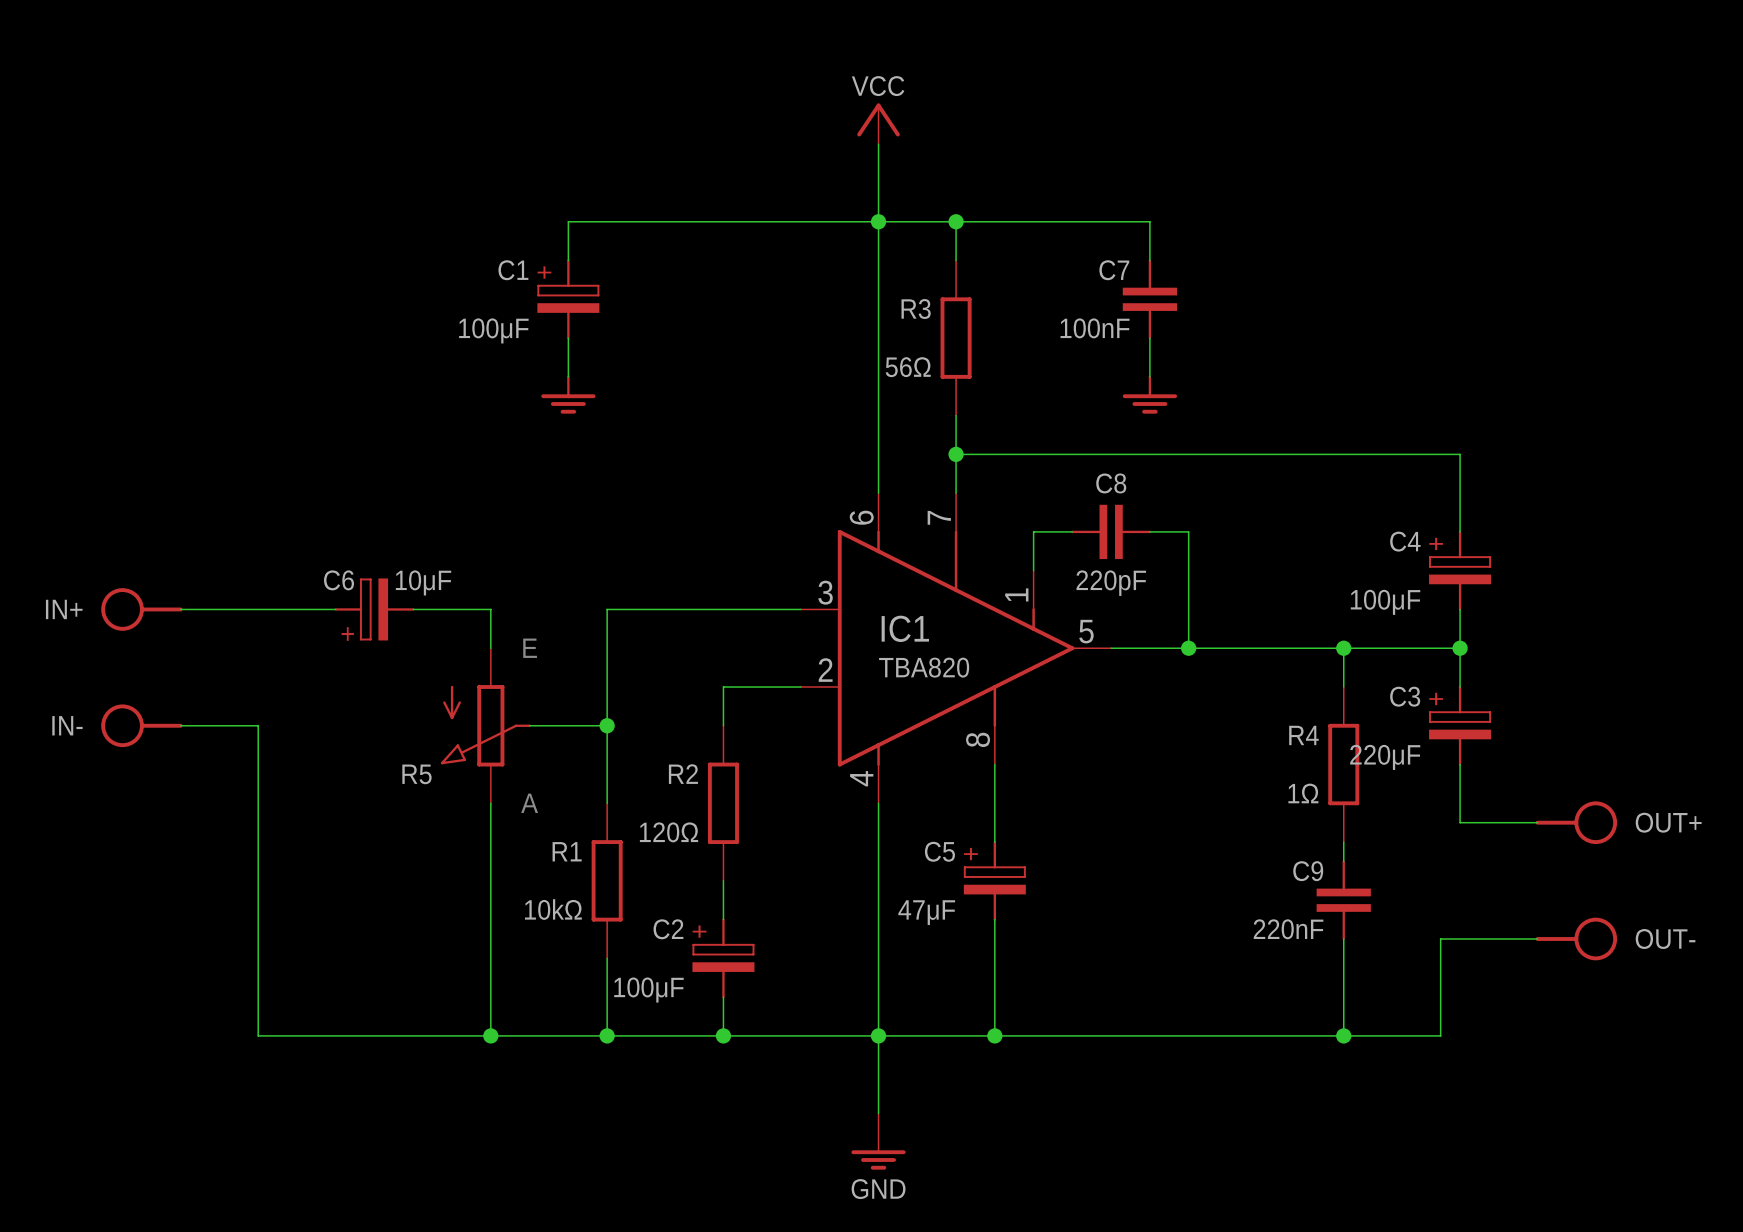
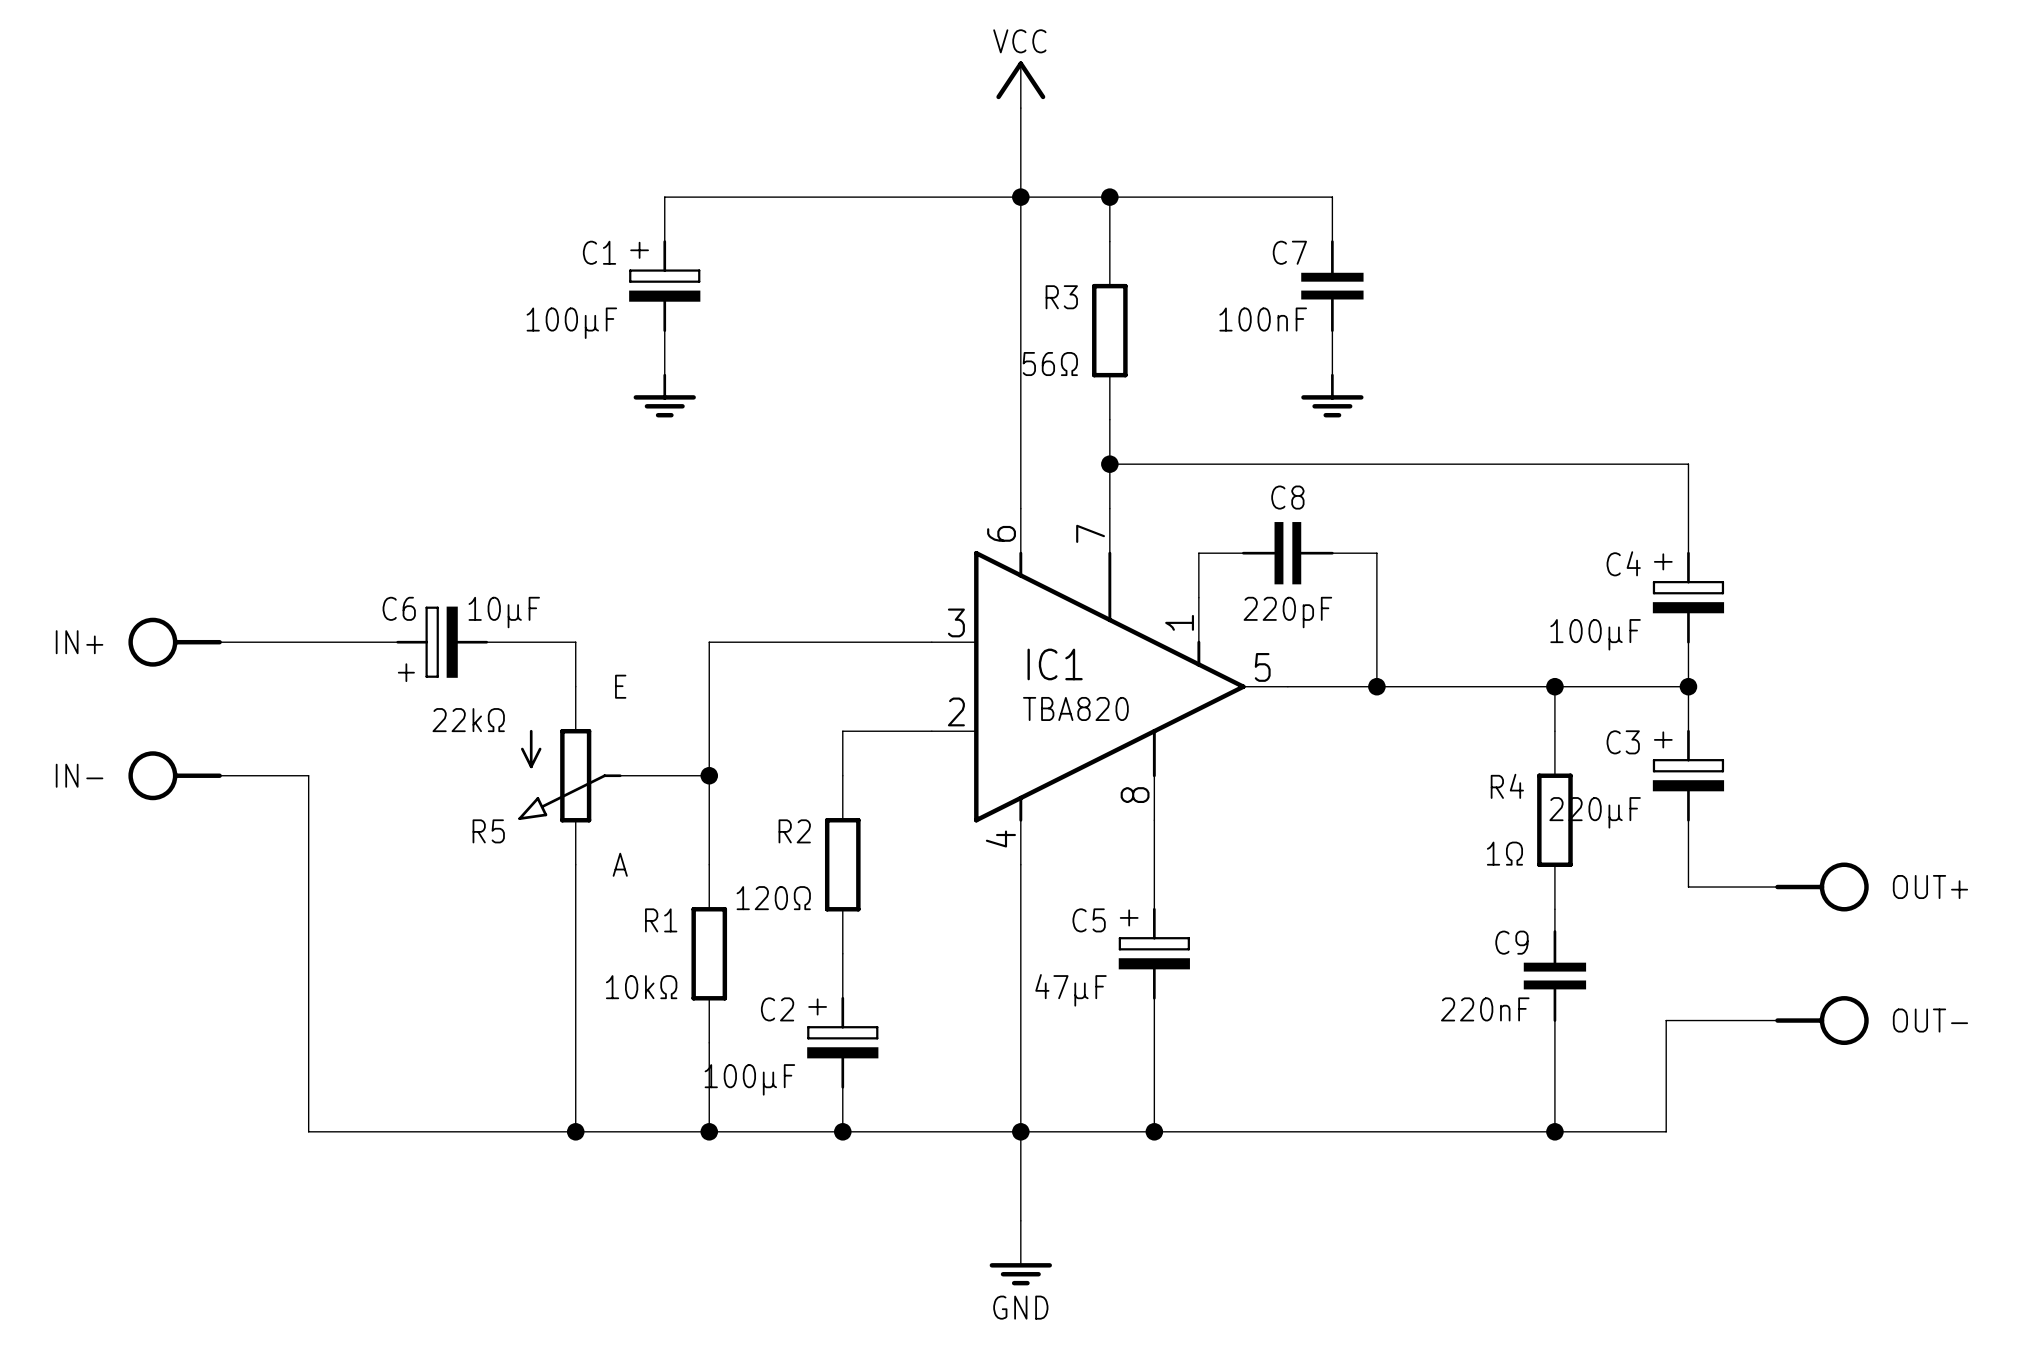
R5 value: none -> 22kΩ (468, 720)

